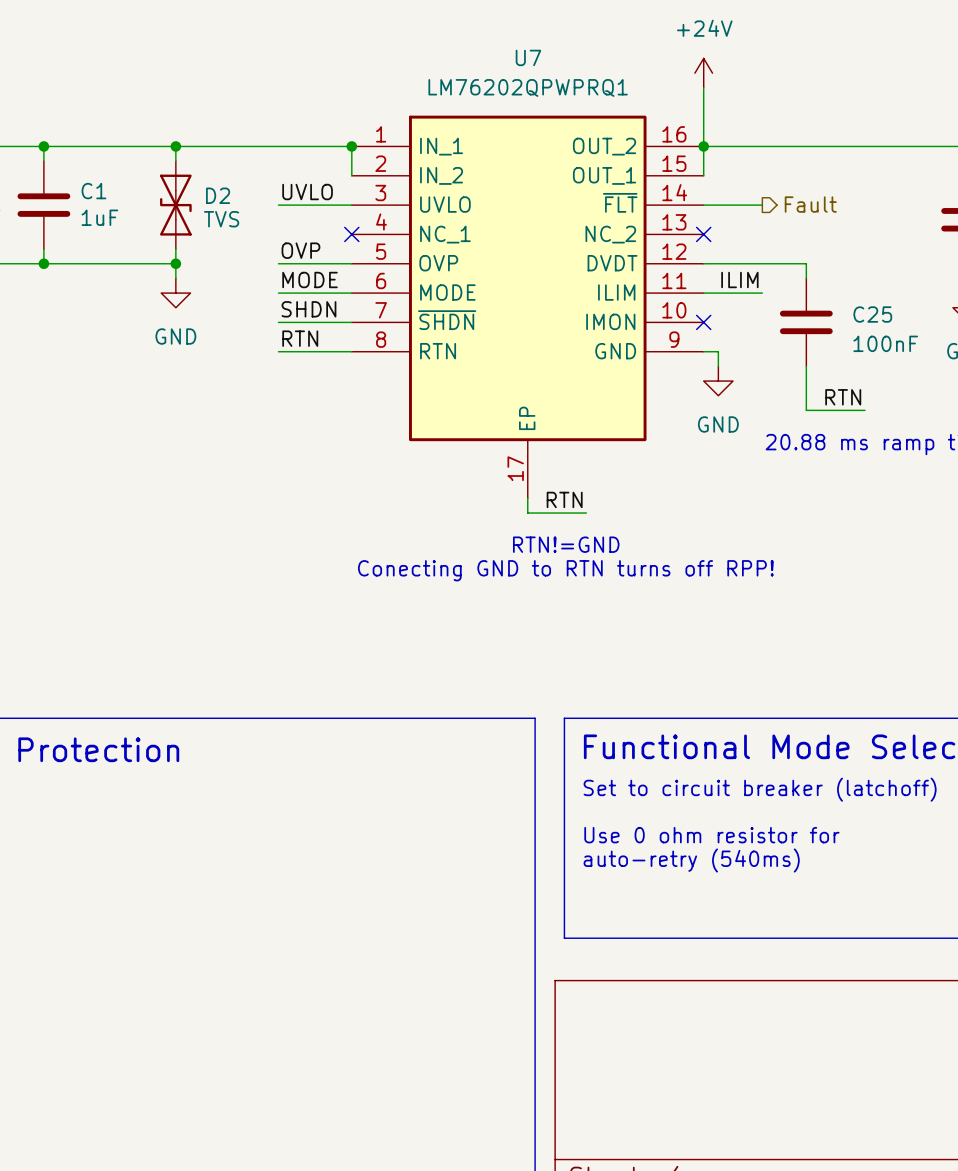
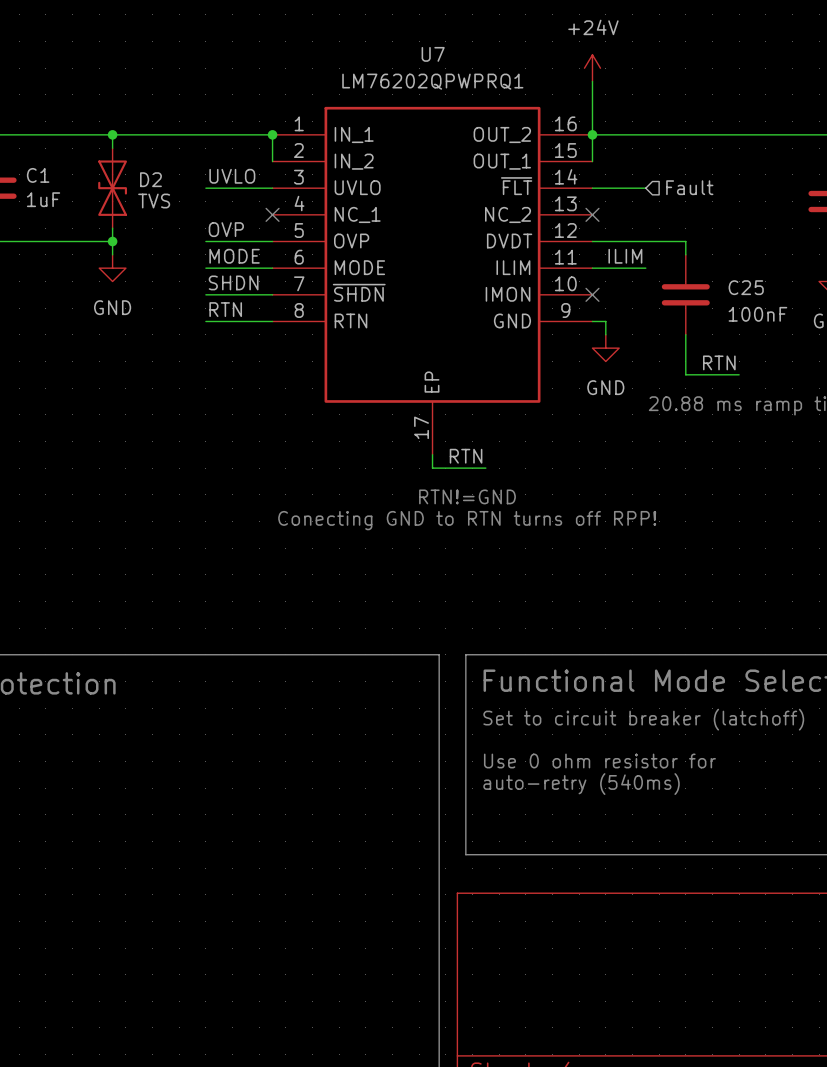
hierarchical label shape: output (810, 204) -> input (689, 187)

